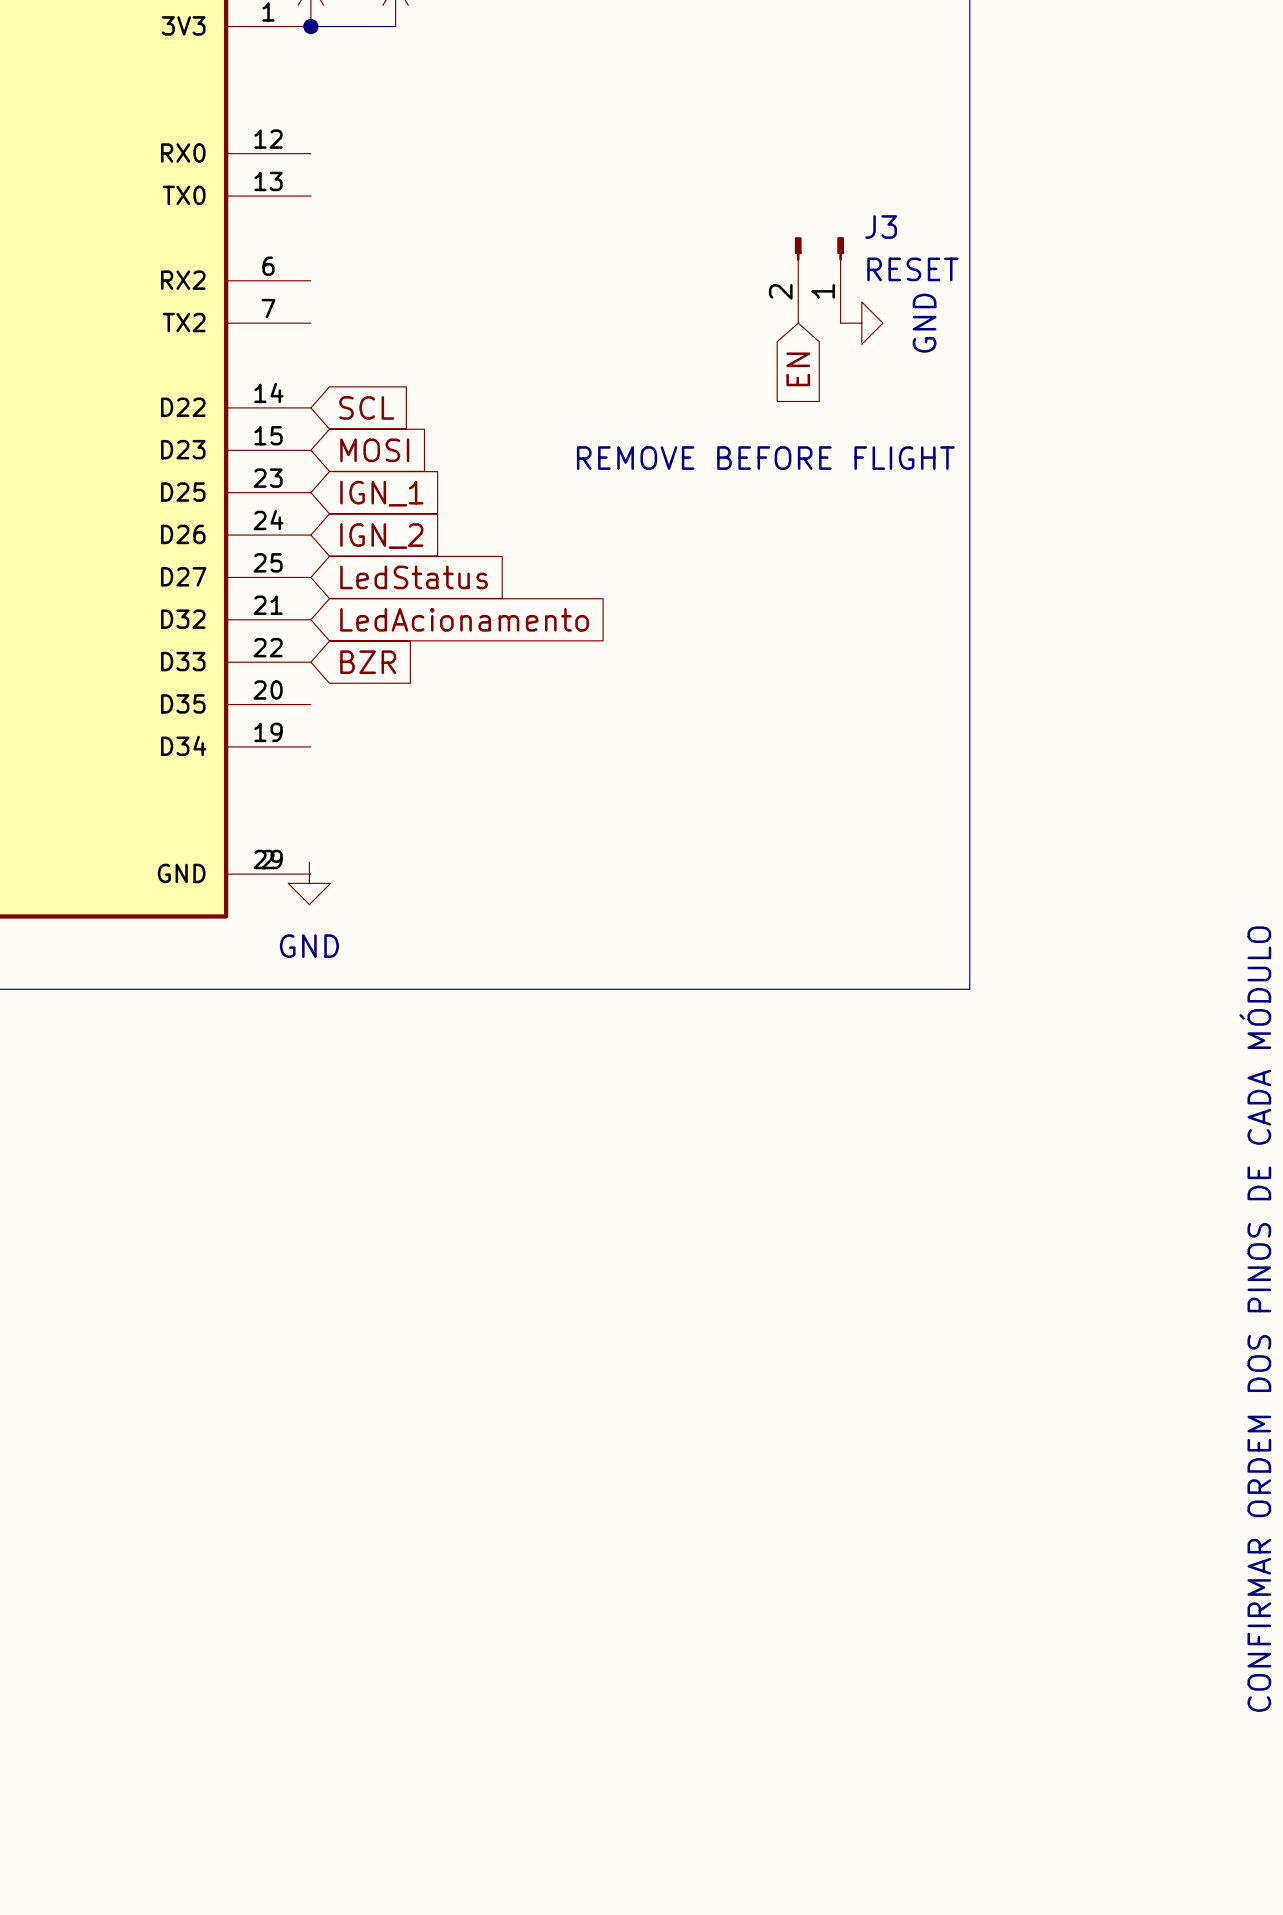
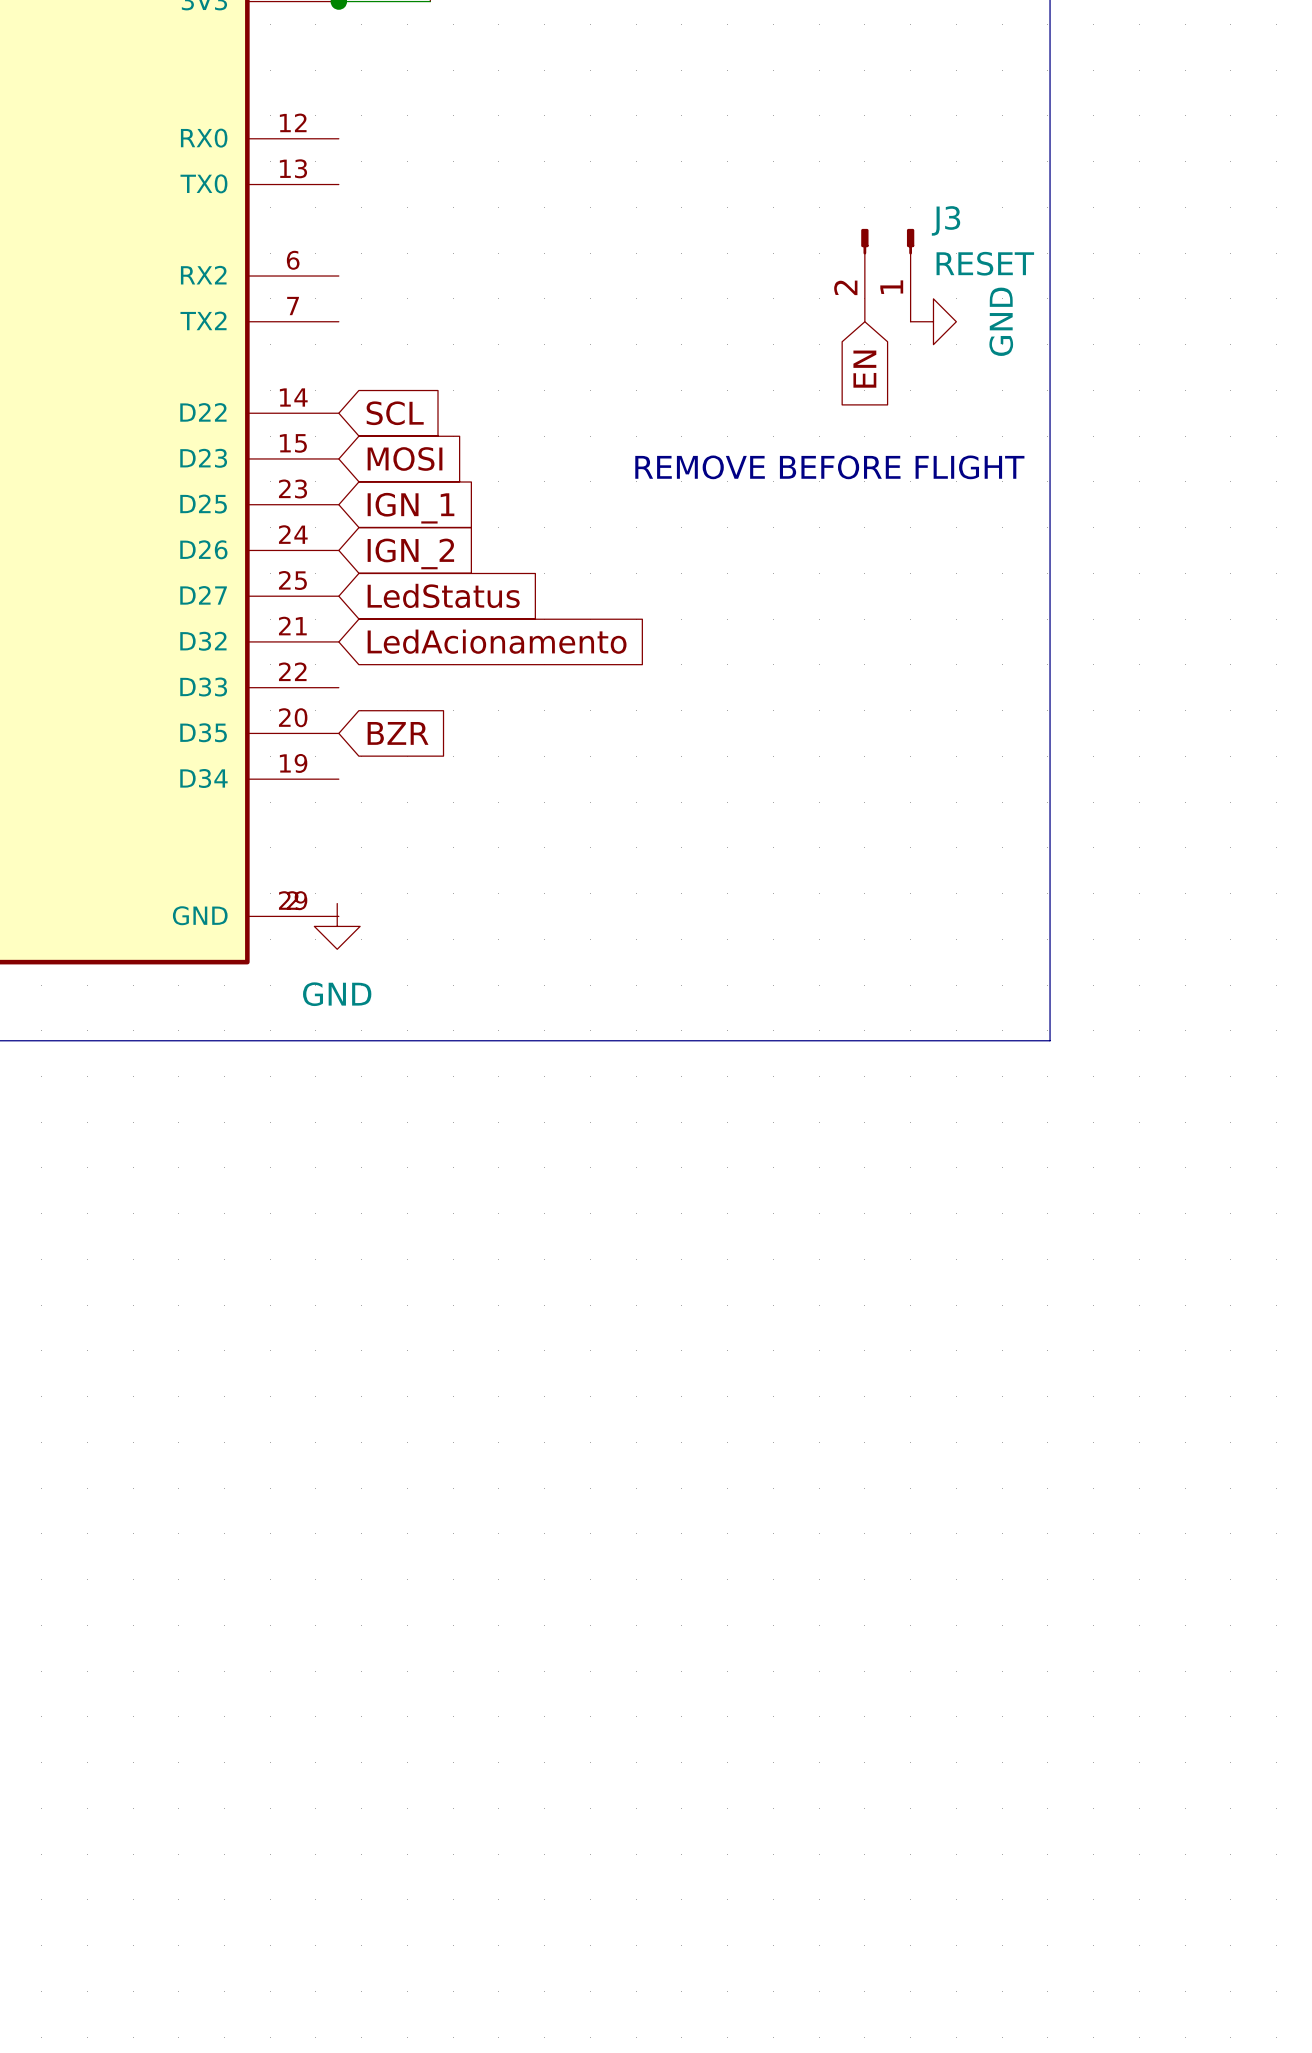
global label position: BZR (368, 662) -> BZR (398, 733)

